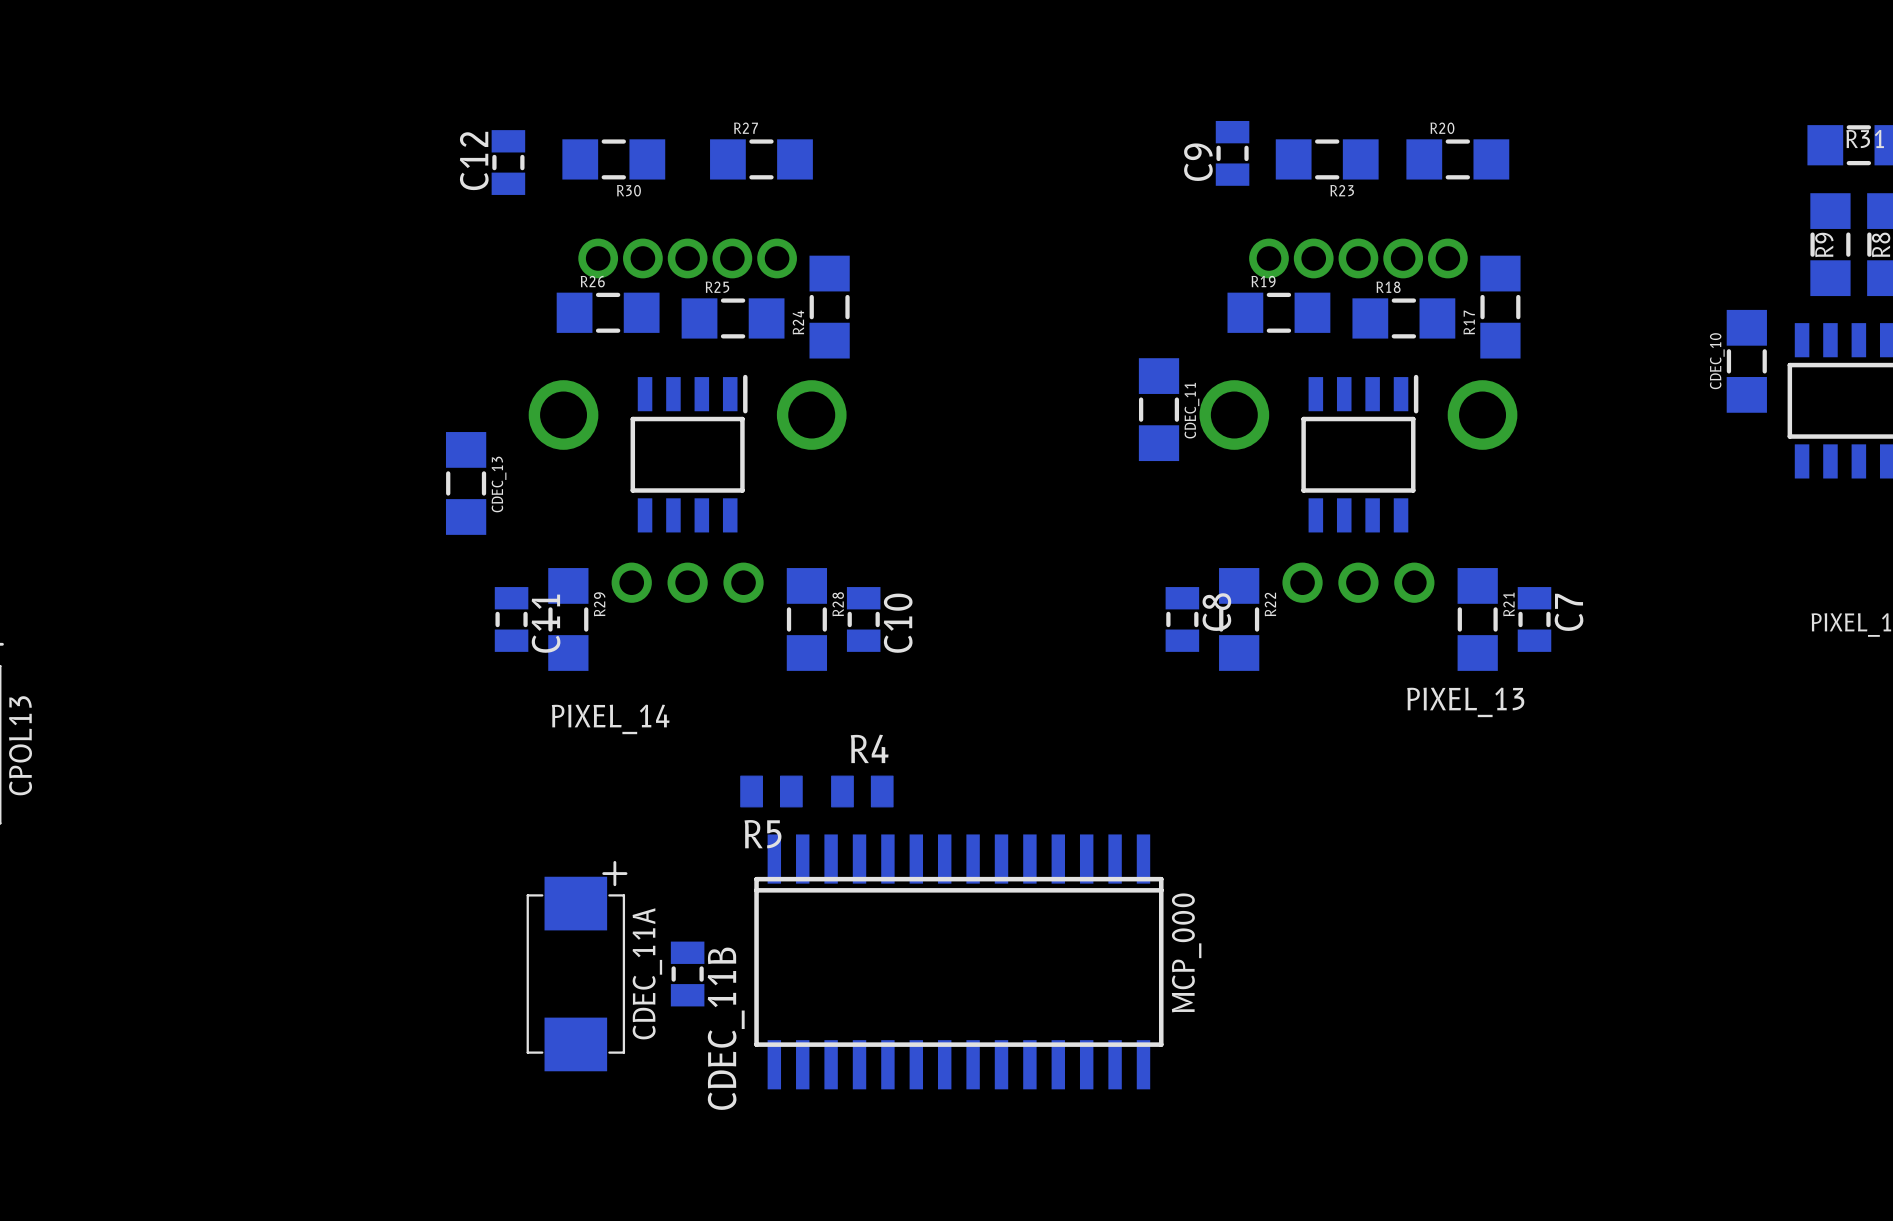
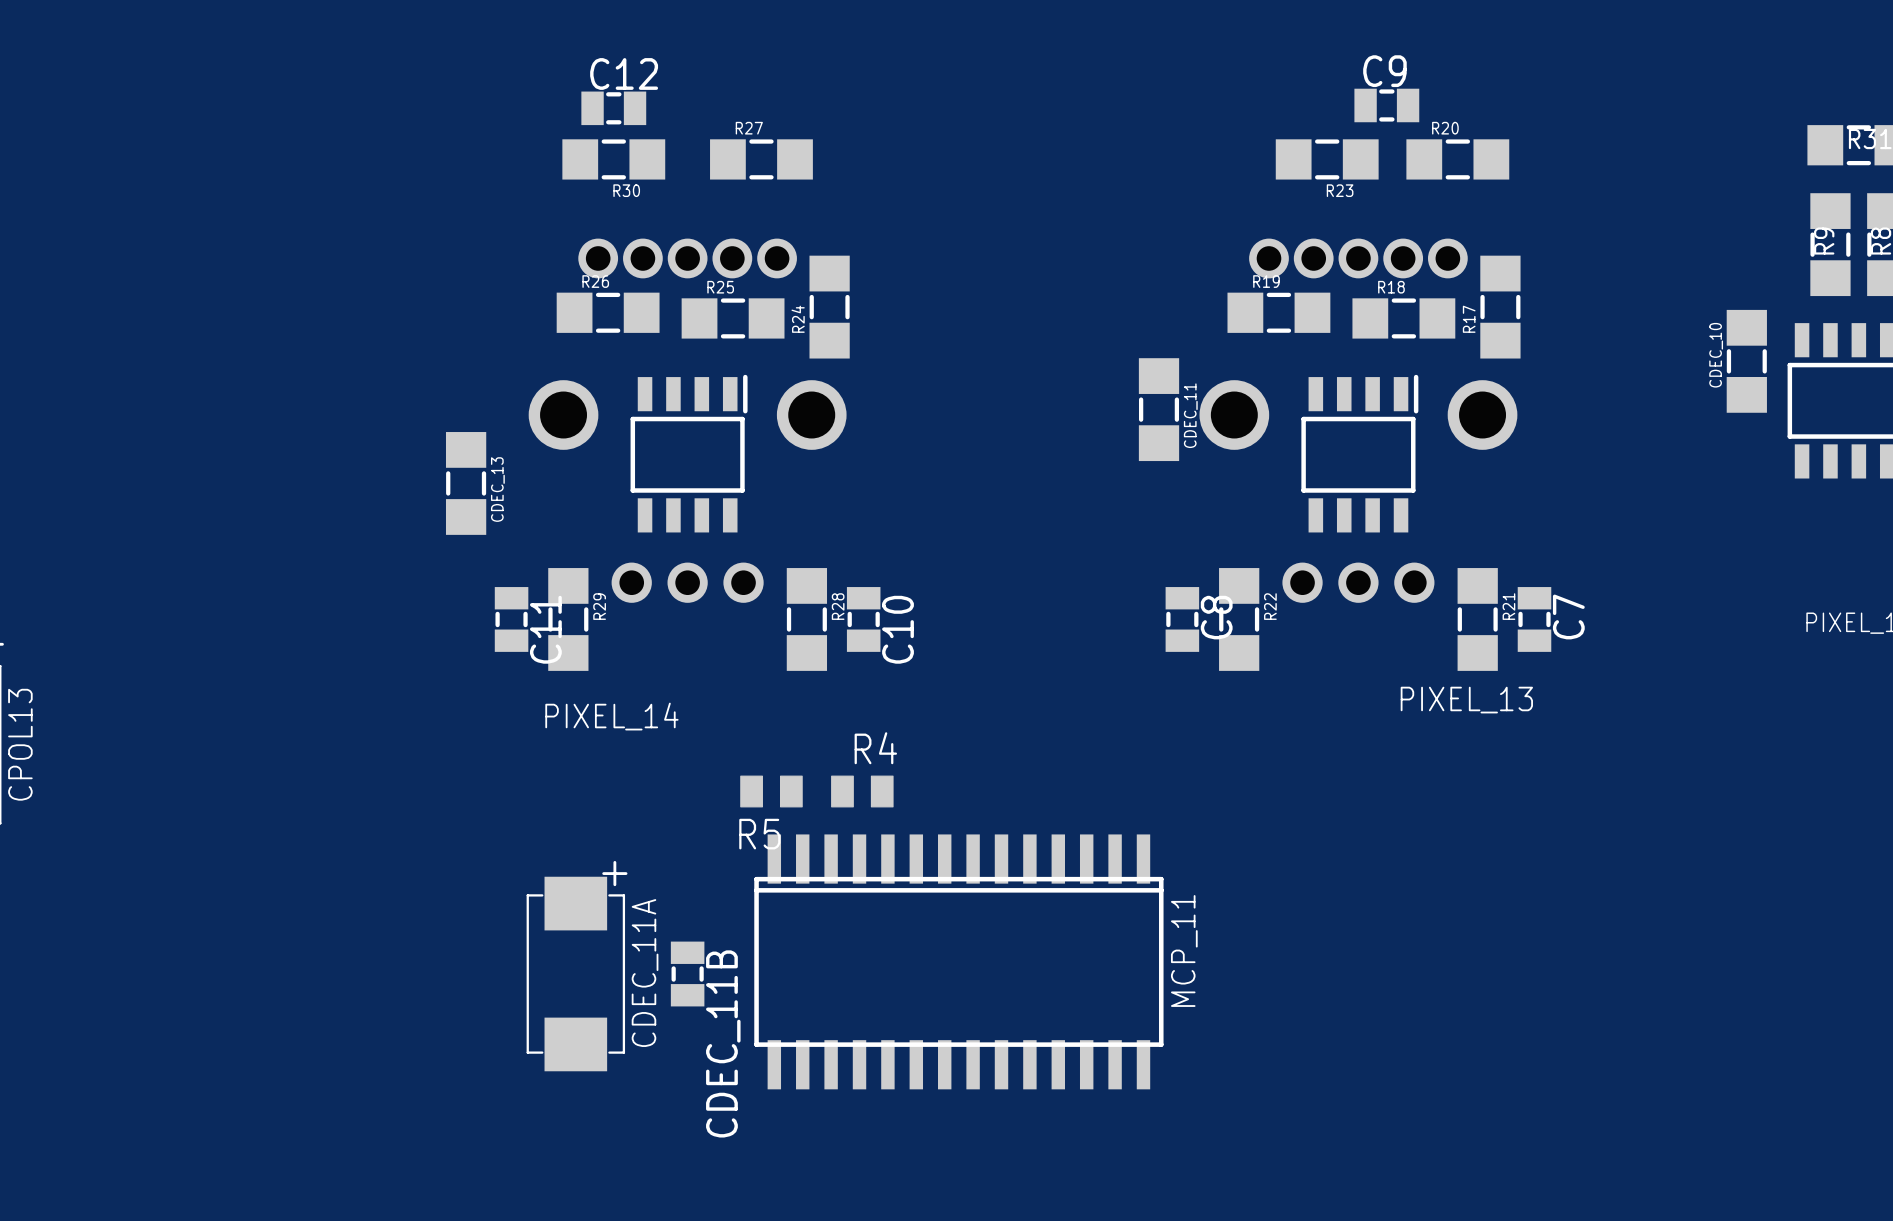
C9 rotation: 0° (1232, 153) -> 90° clockwise (1386, 105)
C9 position: (1232, 153) -> (1386, 105)
C12 rotation: 0° (508, 162) -> 90° clockwise (613, 108)
C12 position: (508, 162) -> (613, 108)
MCP_000 name: MCP_000 (1186, 952) -> MCP_11 (1184, 951)

